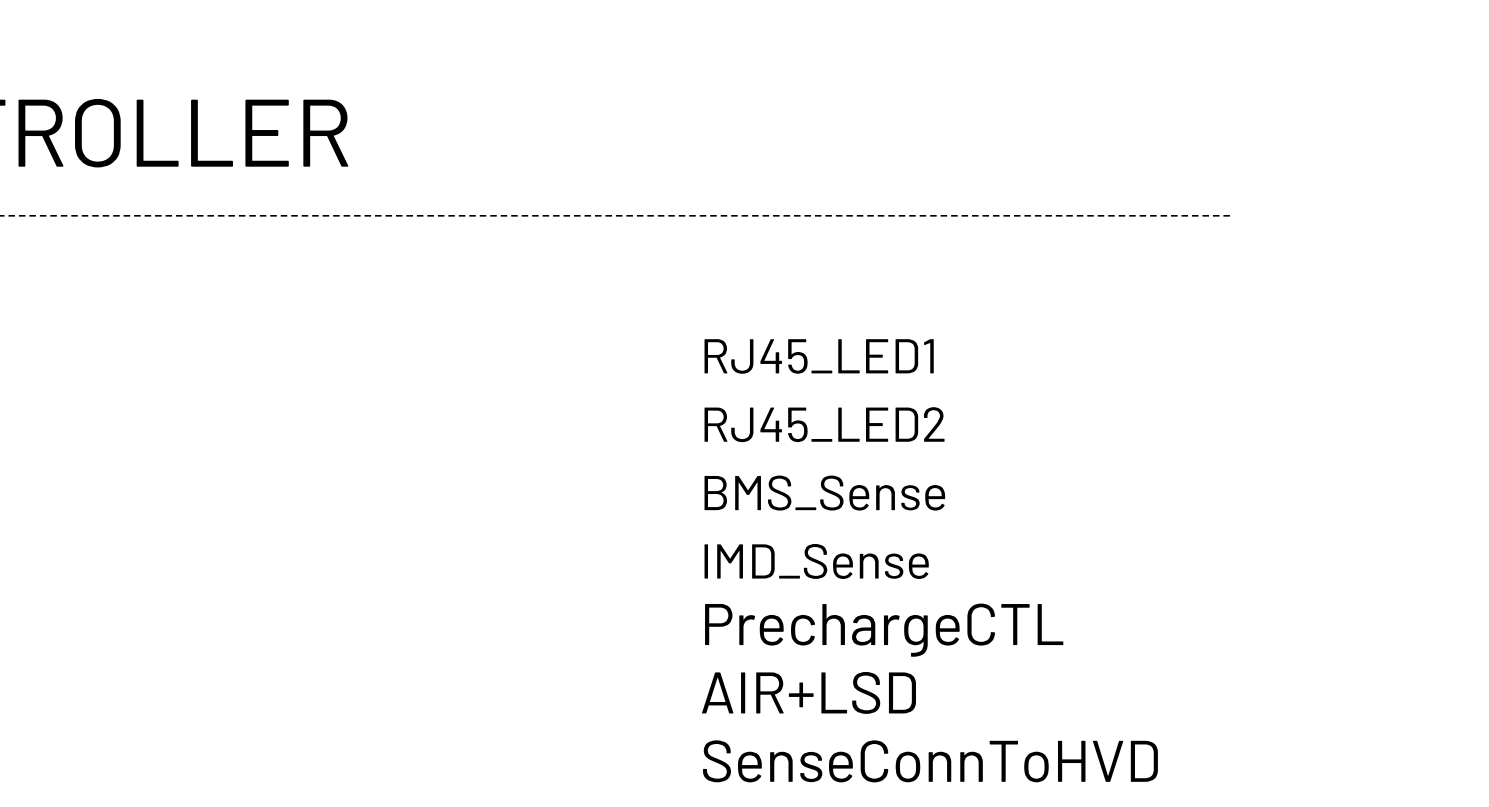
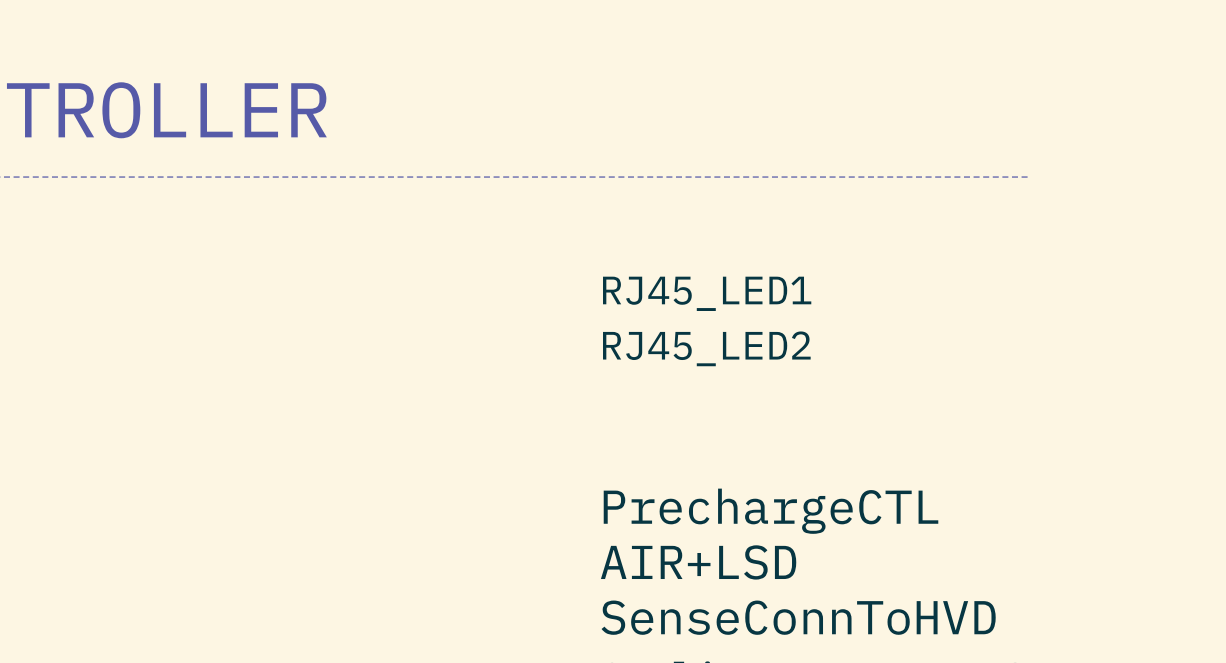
label: BMS_Sense (824, 493) -> none
label: IMD_Sense (816, 561) -> none

